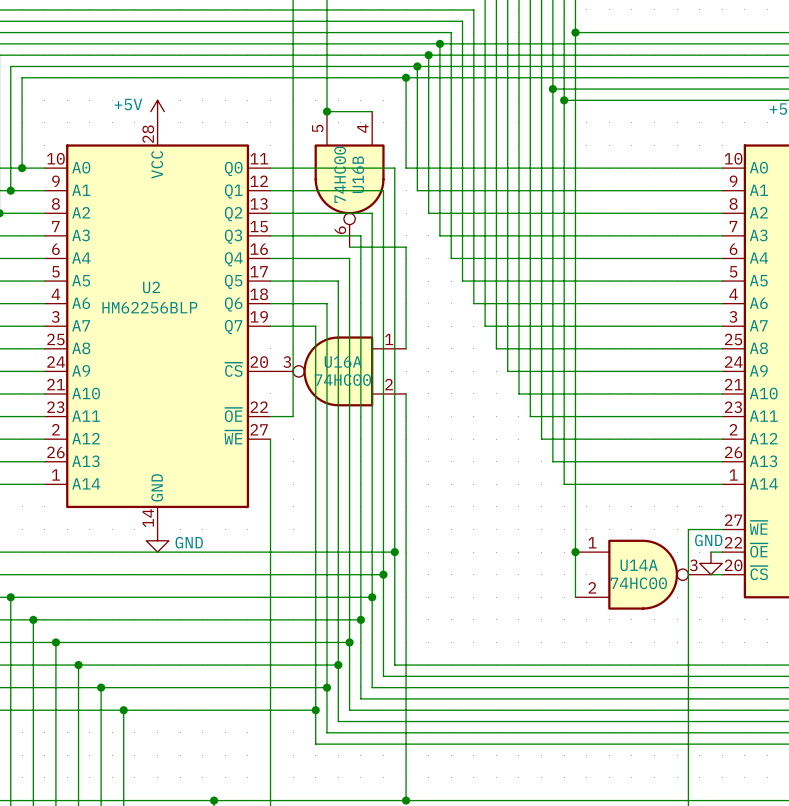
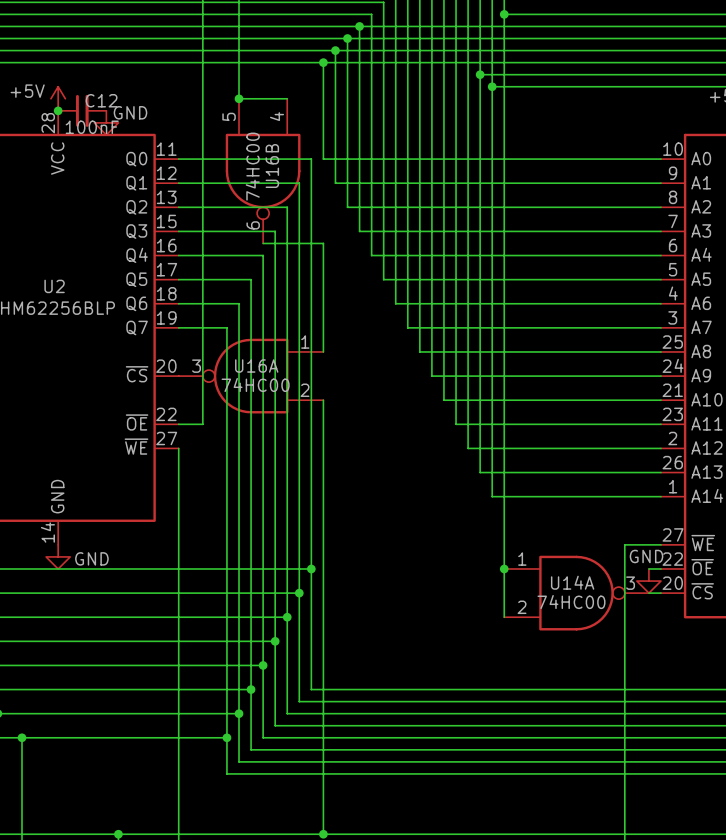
junction: none -> (58, 110)
C12: none -> 100nF (82, 110)
power symbol: none -> GND (106, 122)

